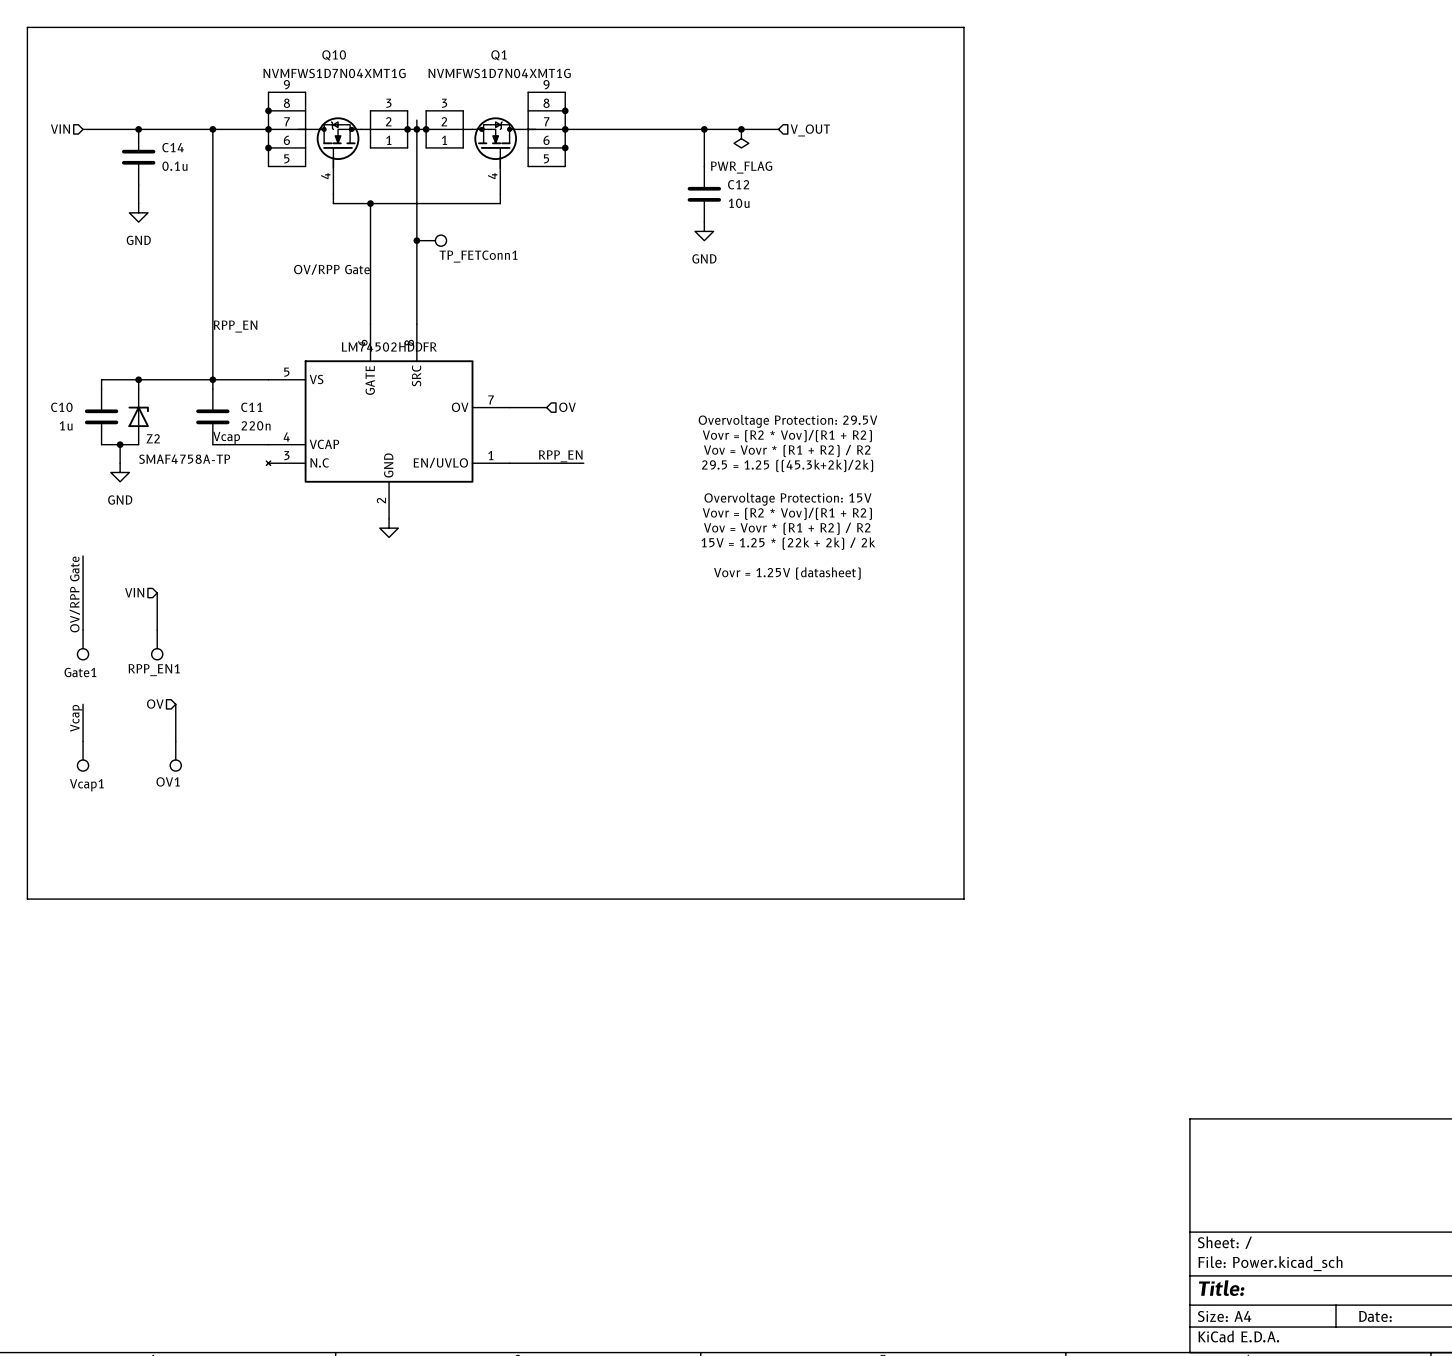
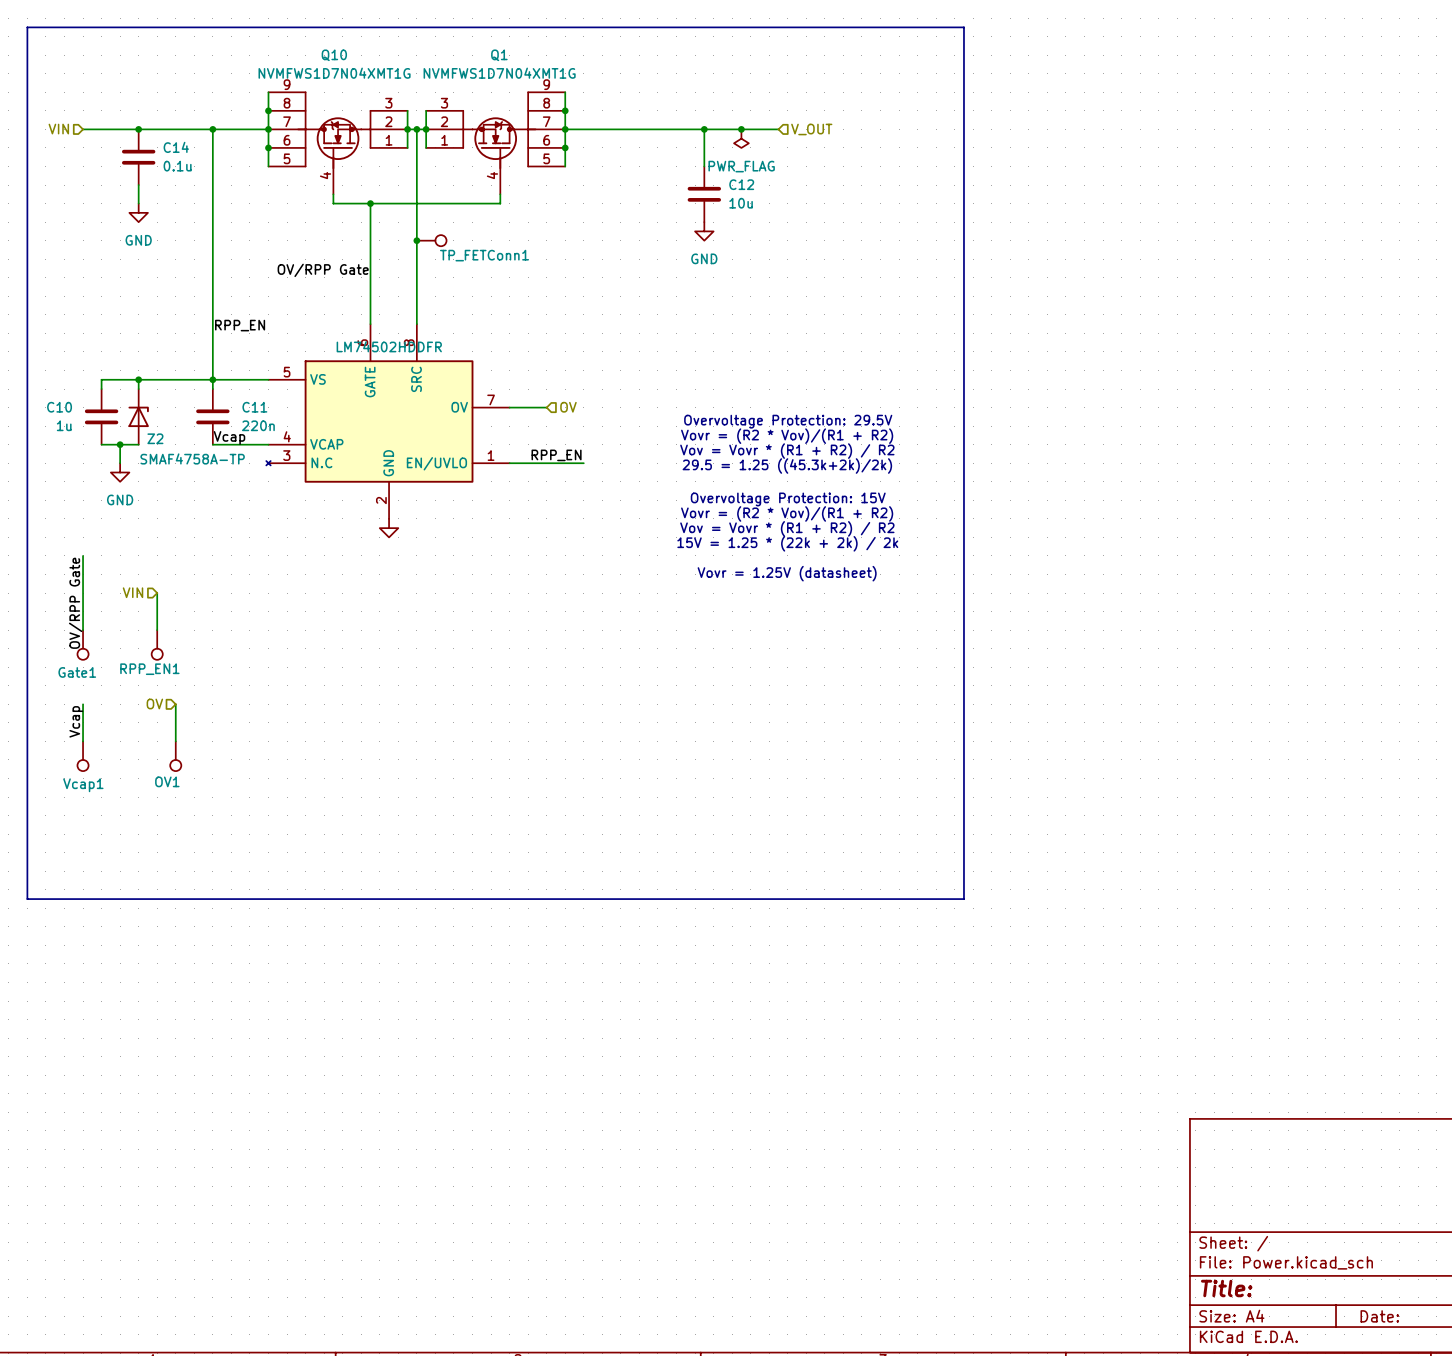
wire: (416, 120) (416, 129) -> none

